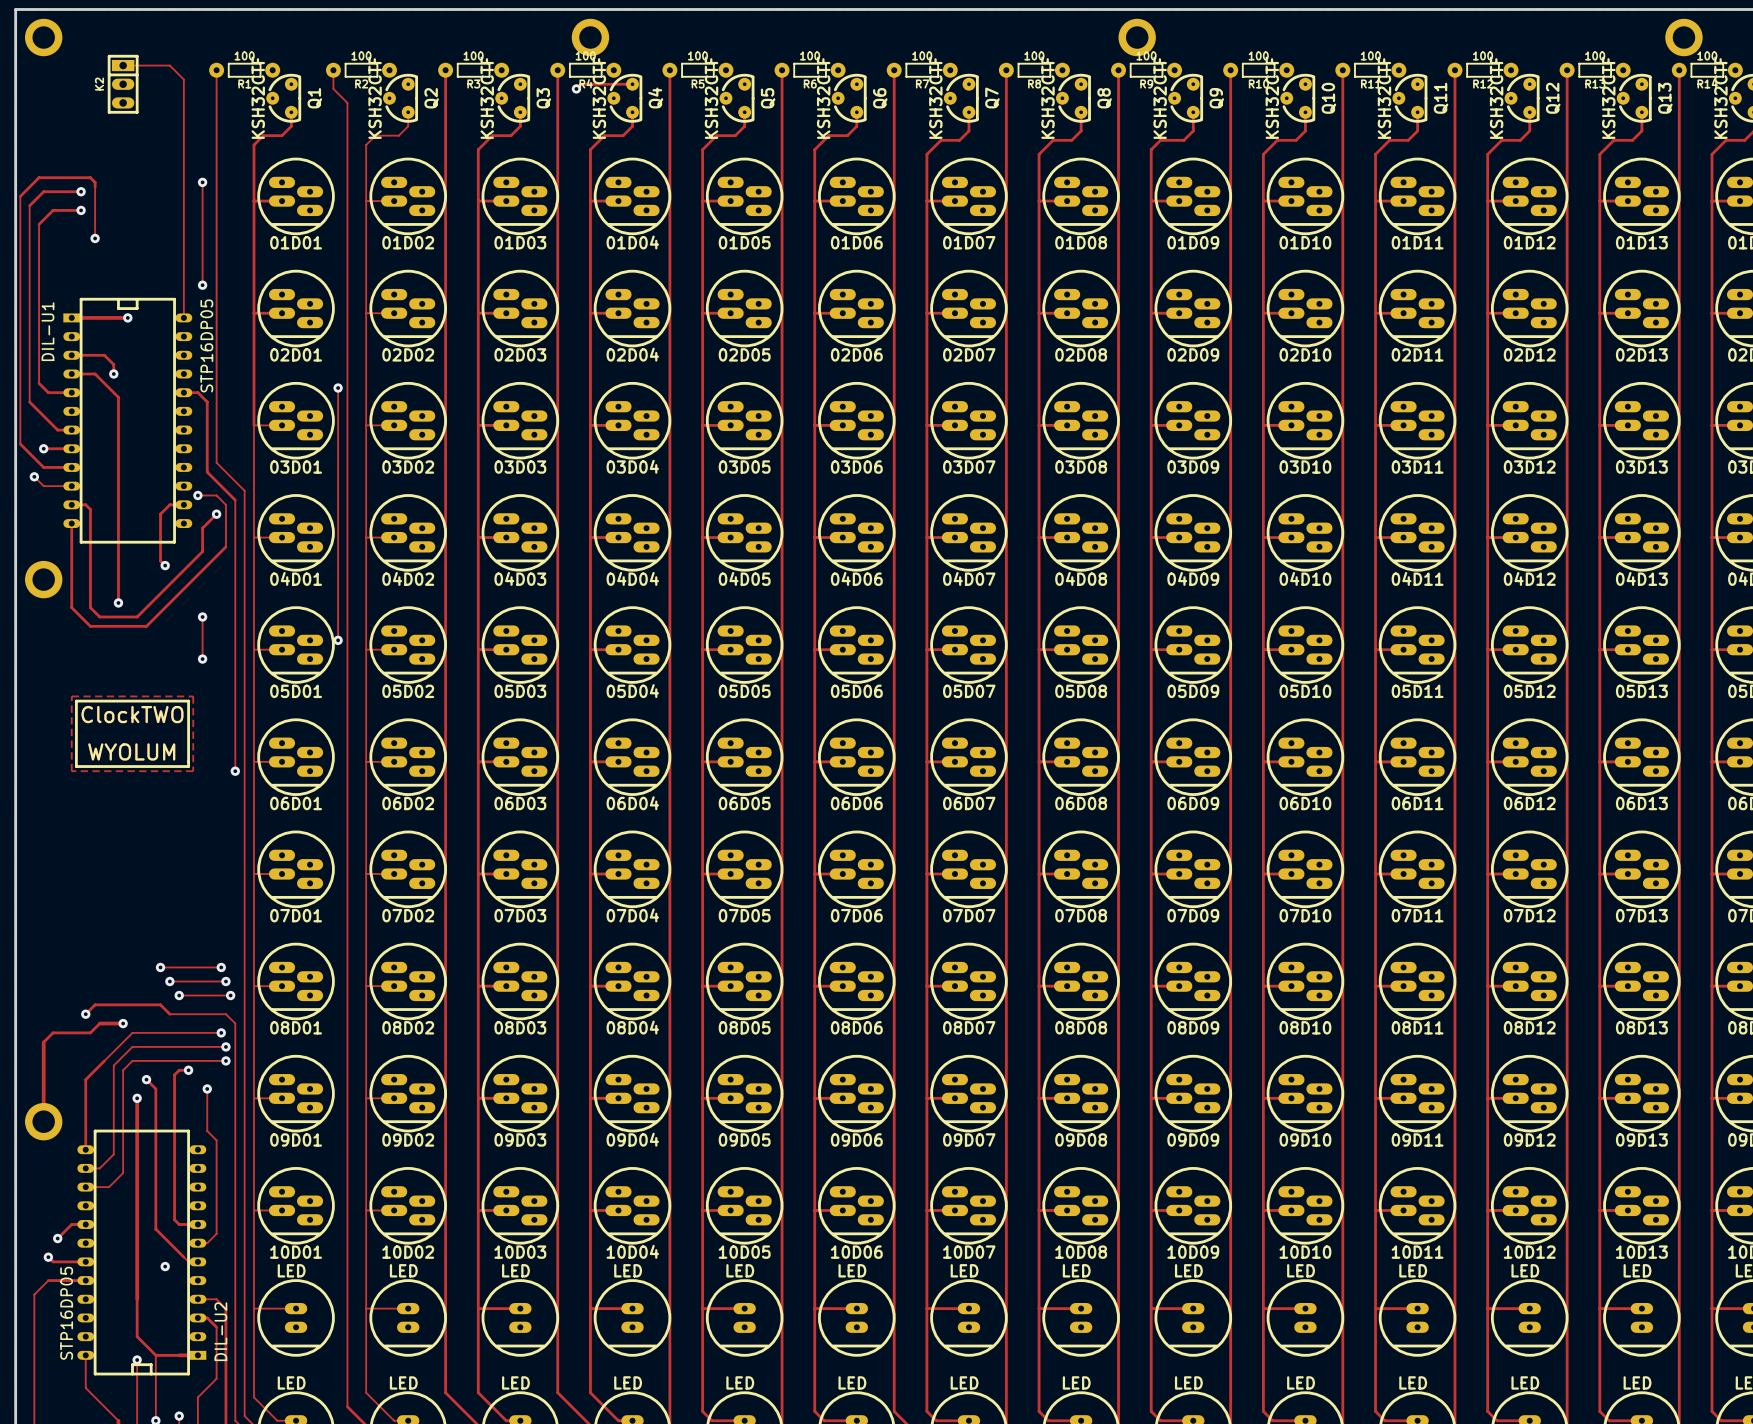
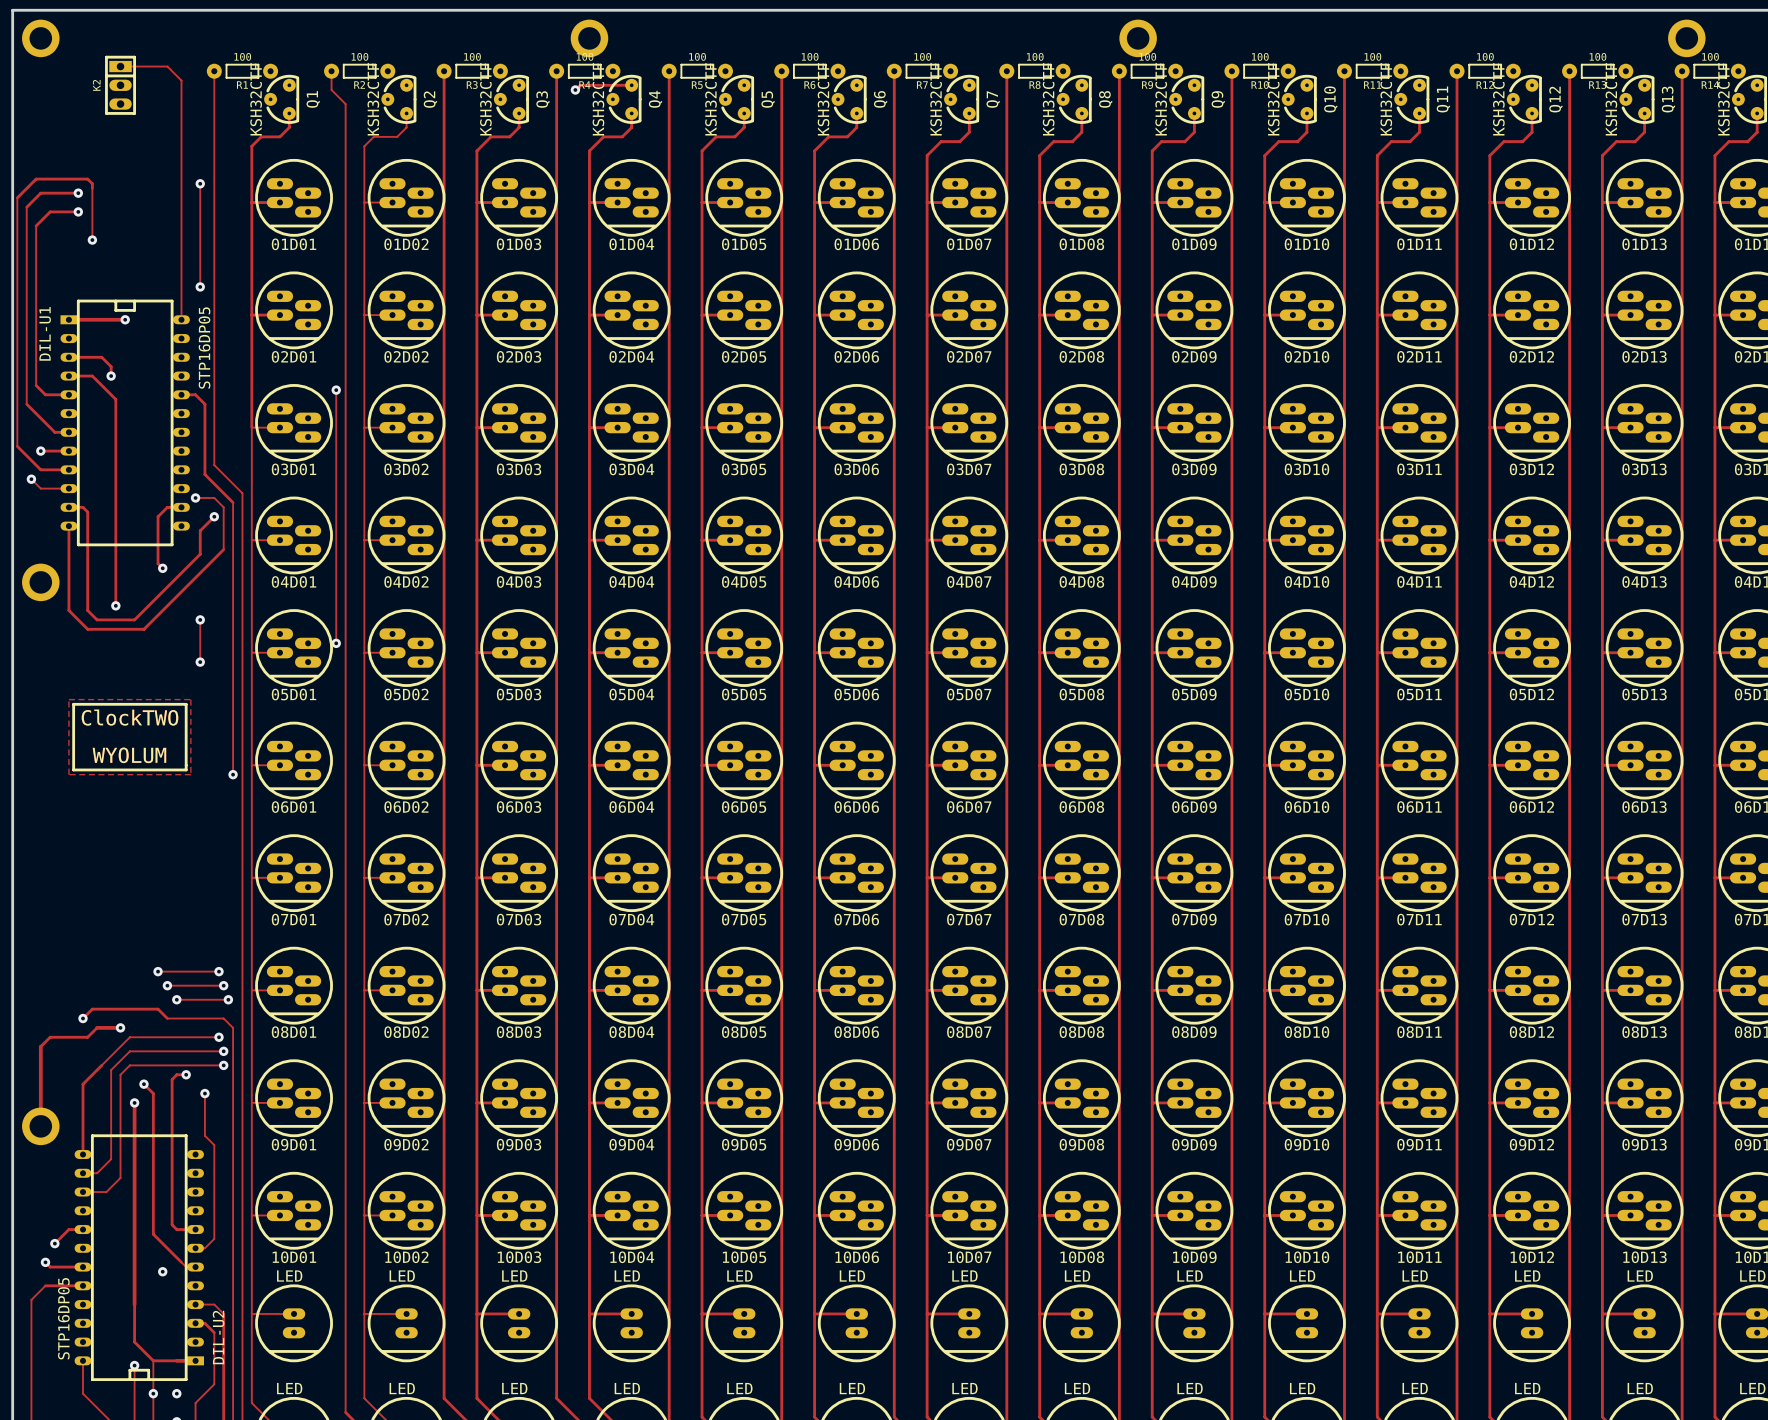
via: none -> (153, 1393)
via: none -> (176, 1393)

